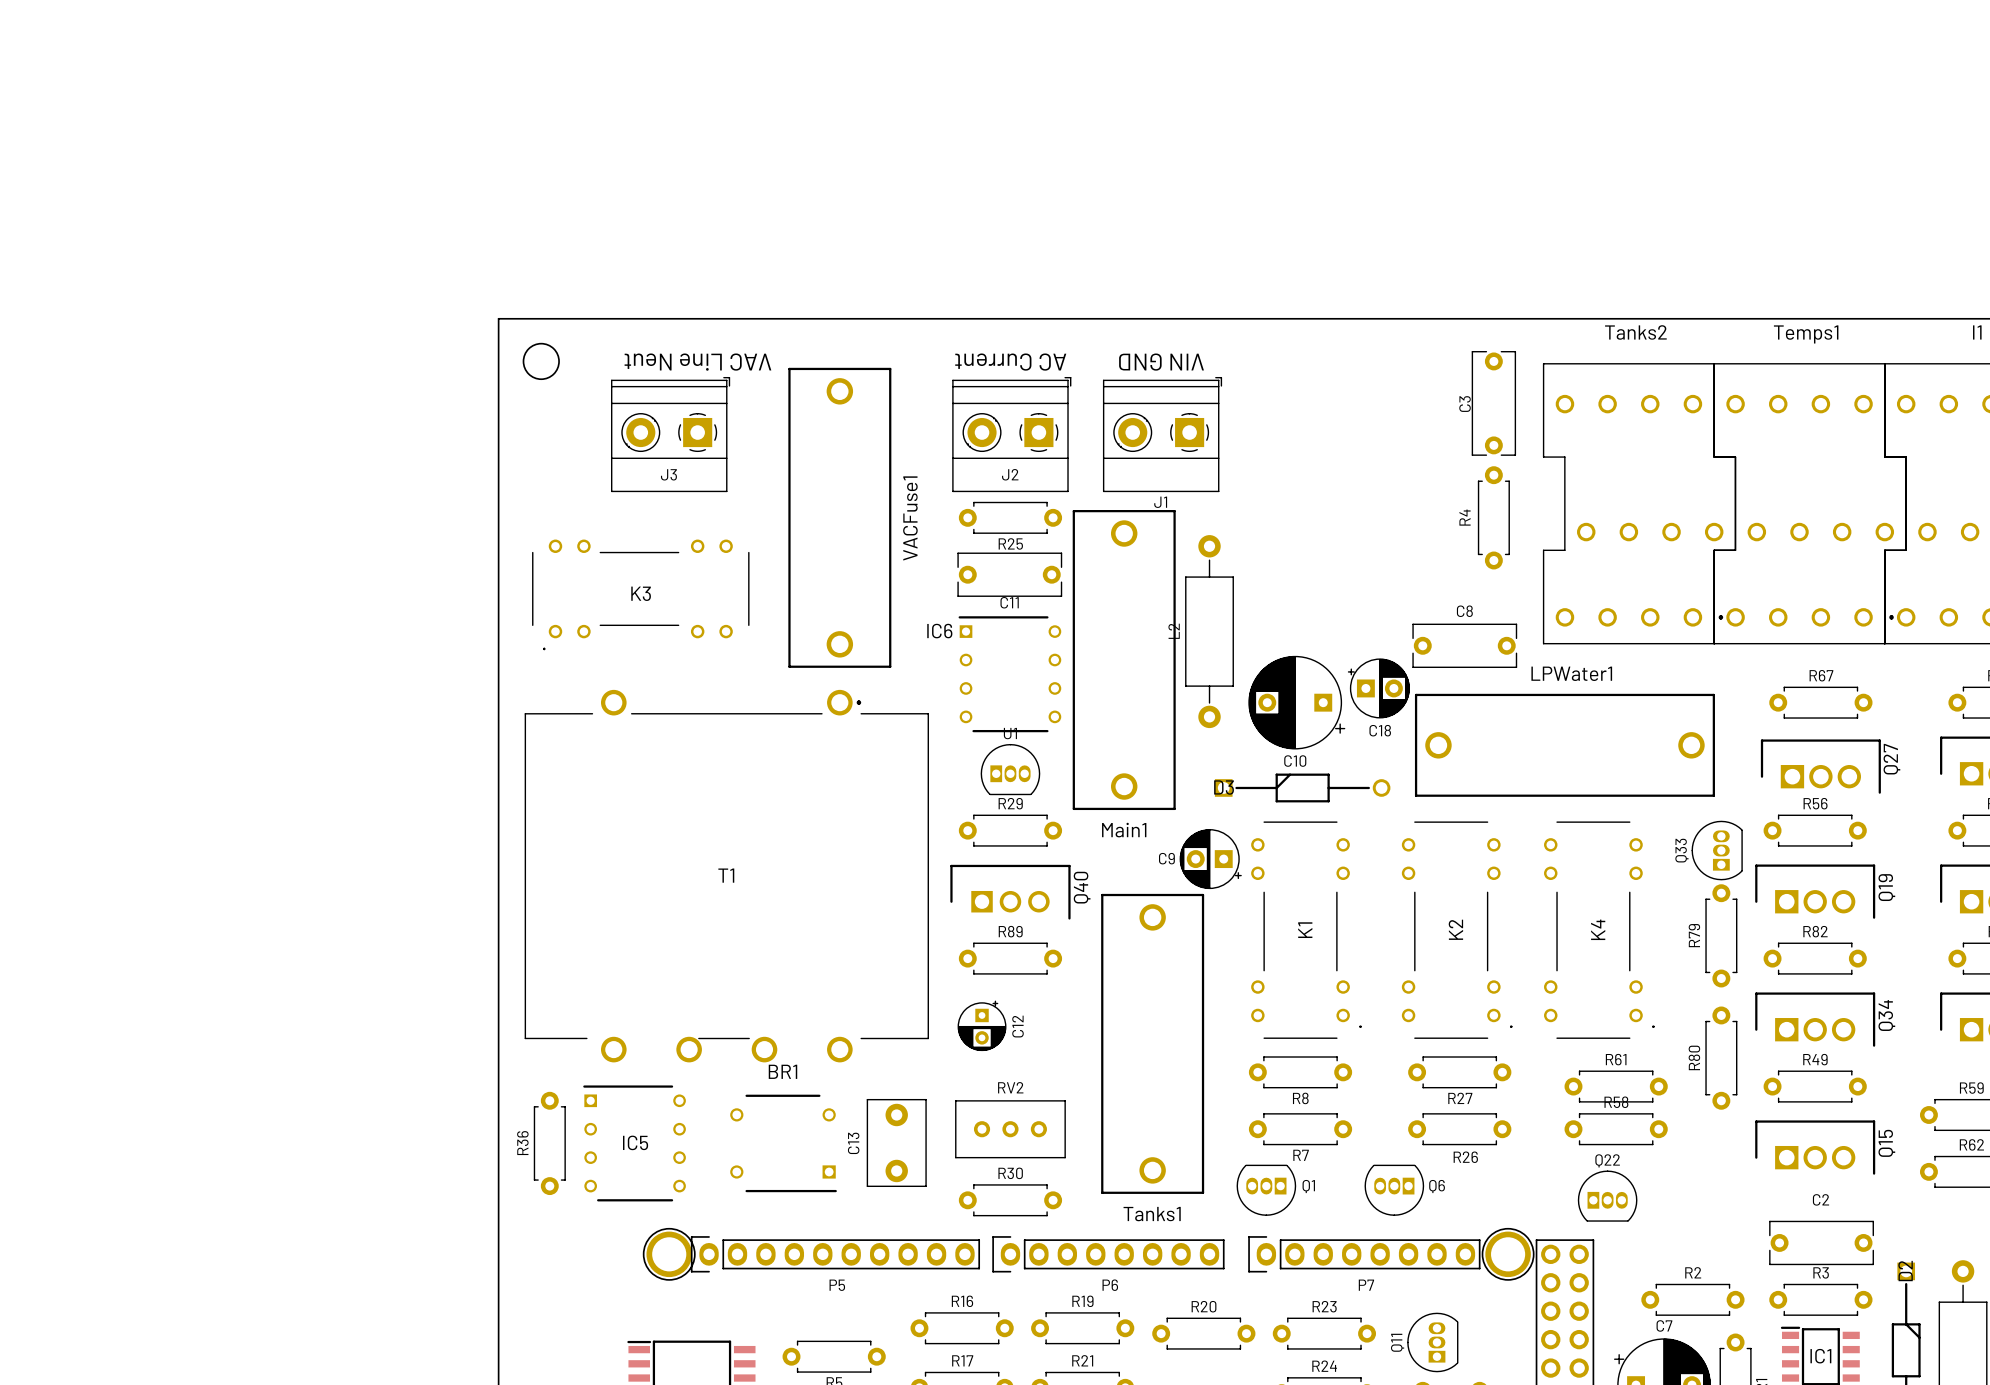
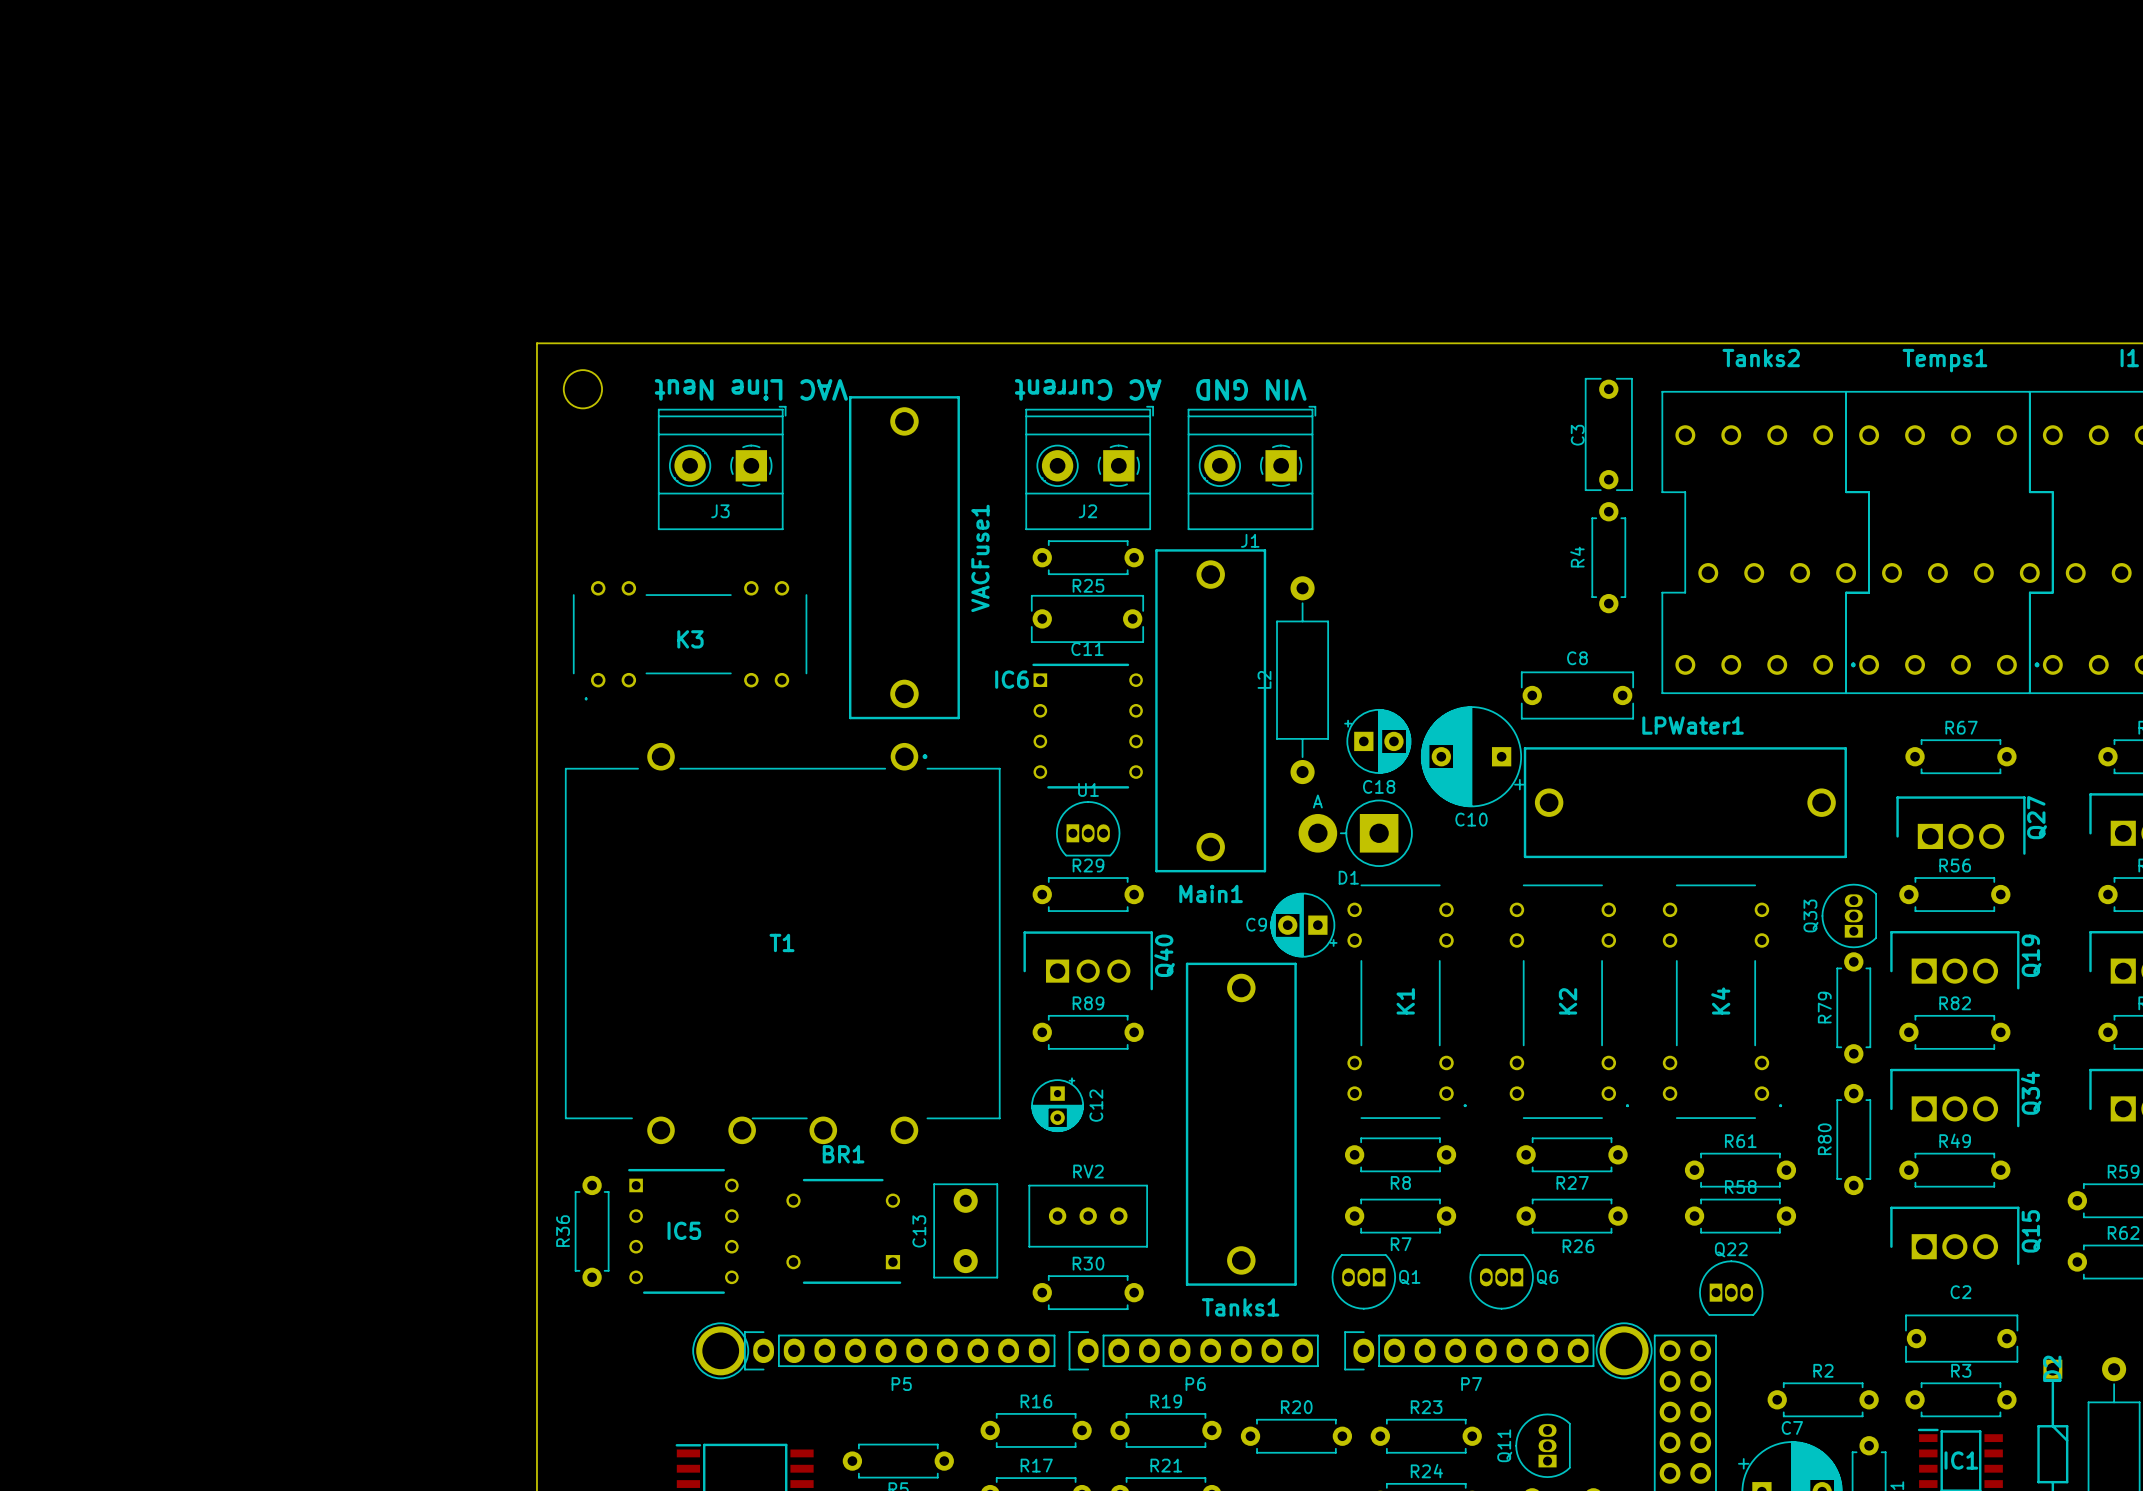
C18 position: (1378, 688) -> (1377, 741)
C10 position: (1296, 702) -> (1473, 756)
D1: none -> (1355, 833)
D3: (1302, 787) -> none

